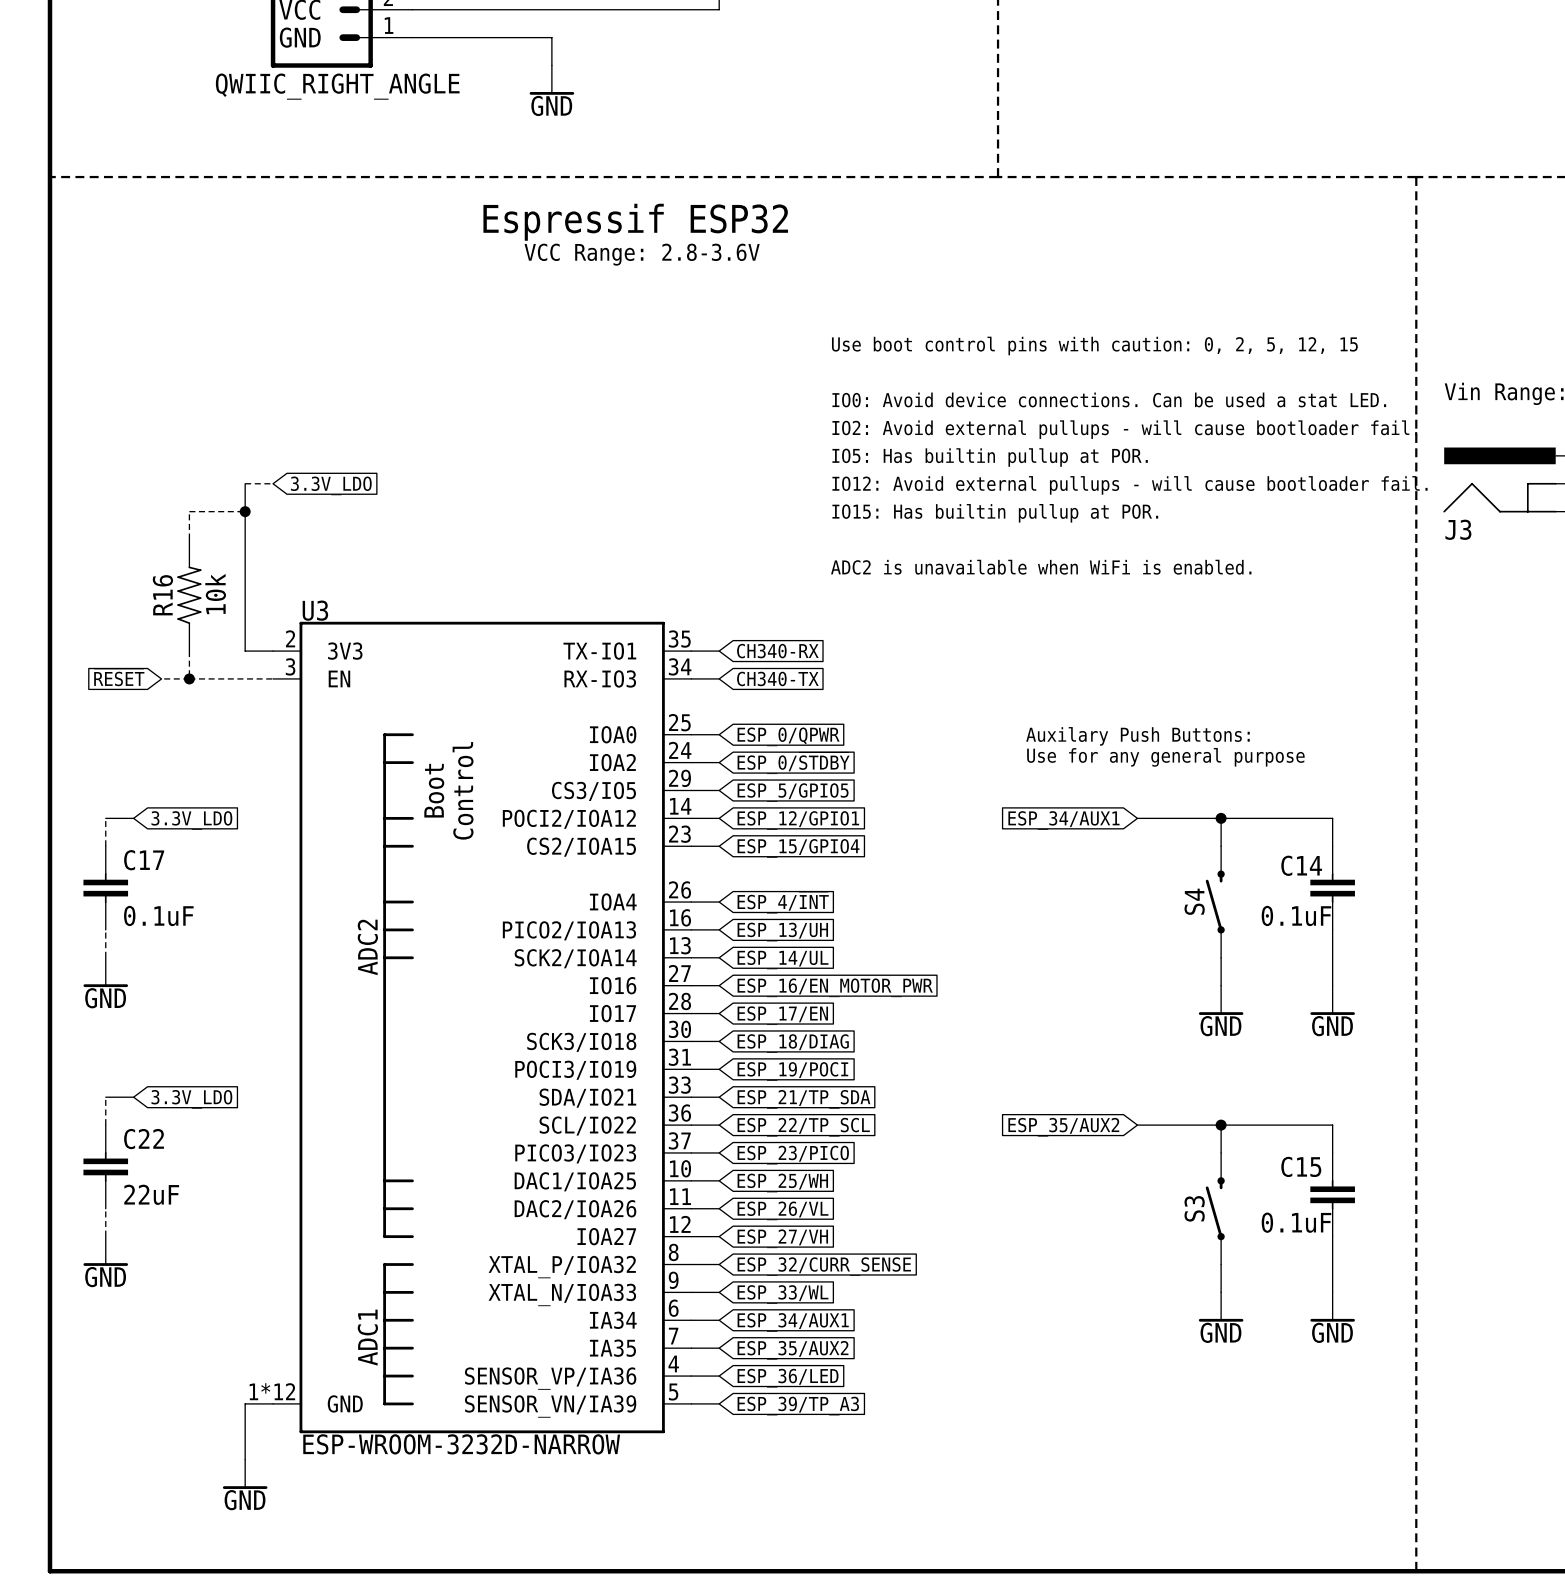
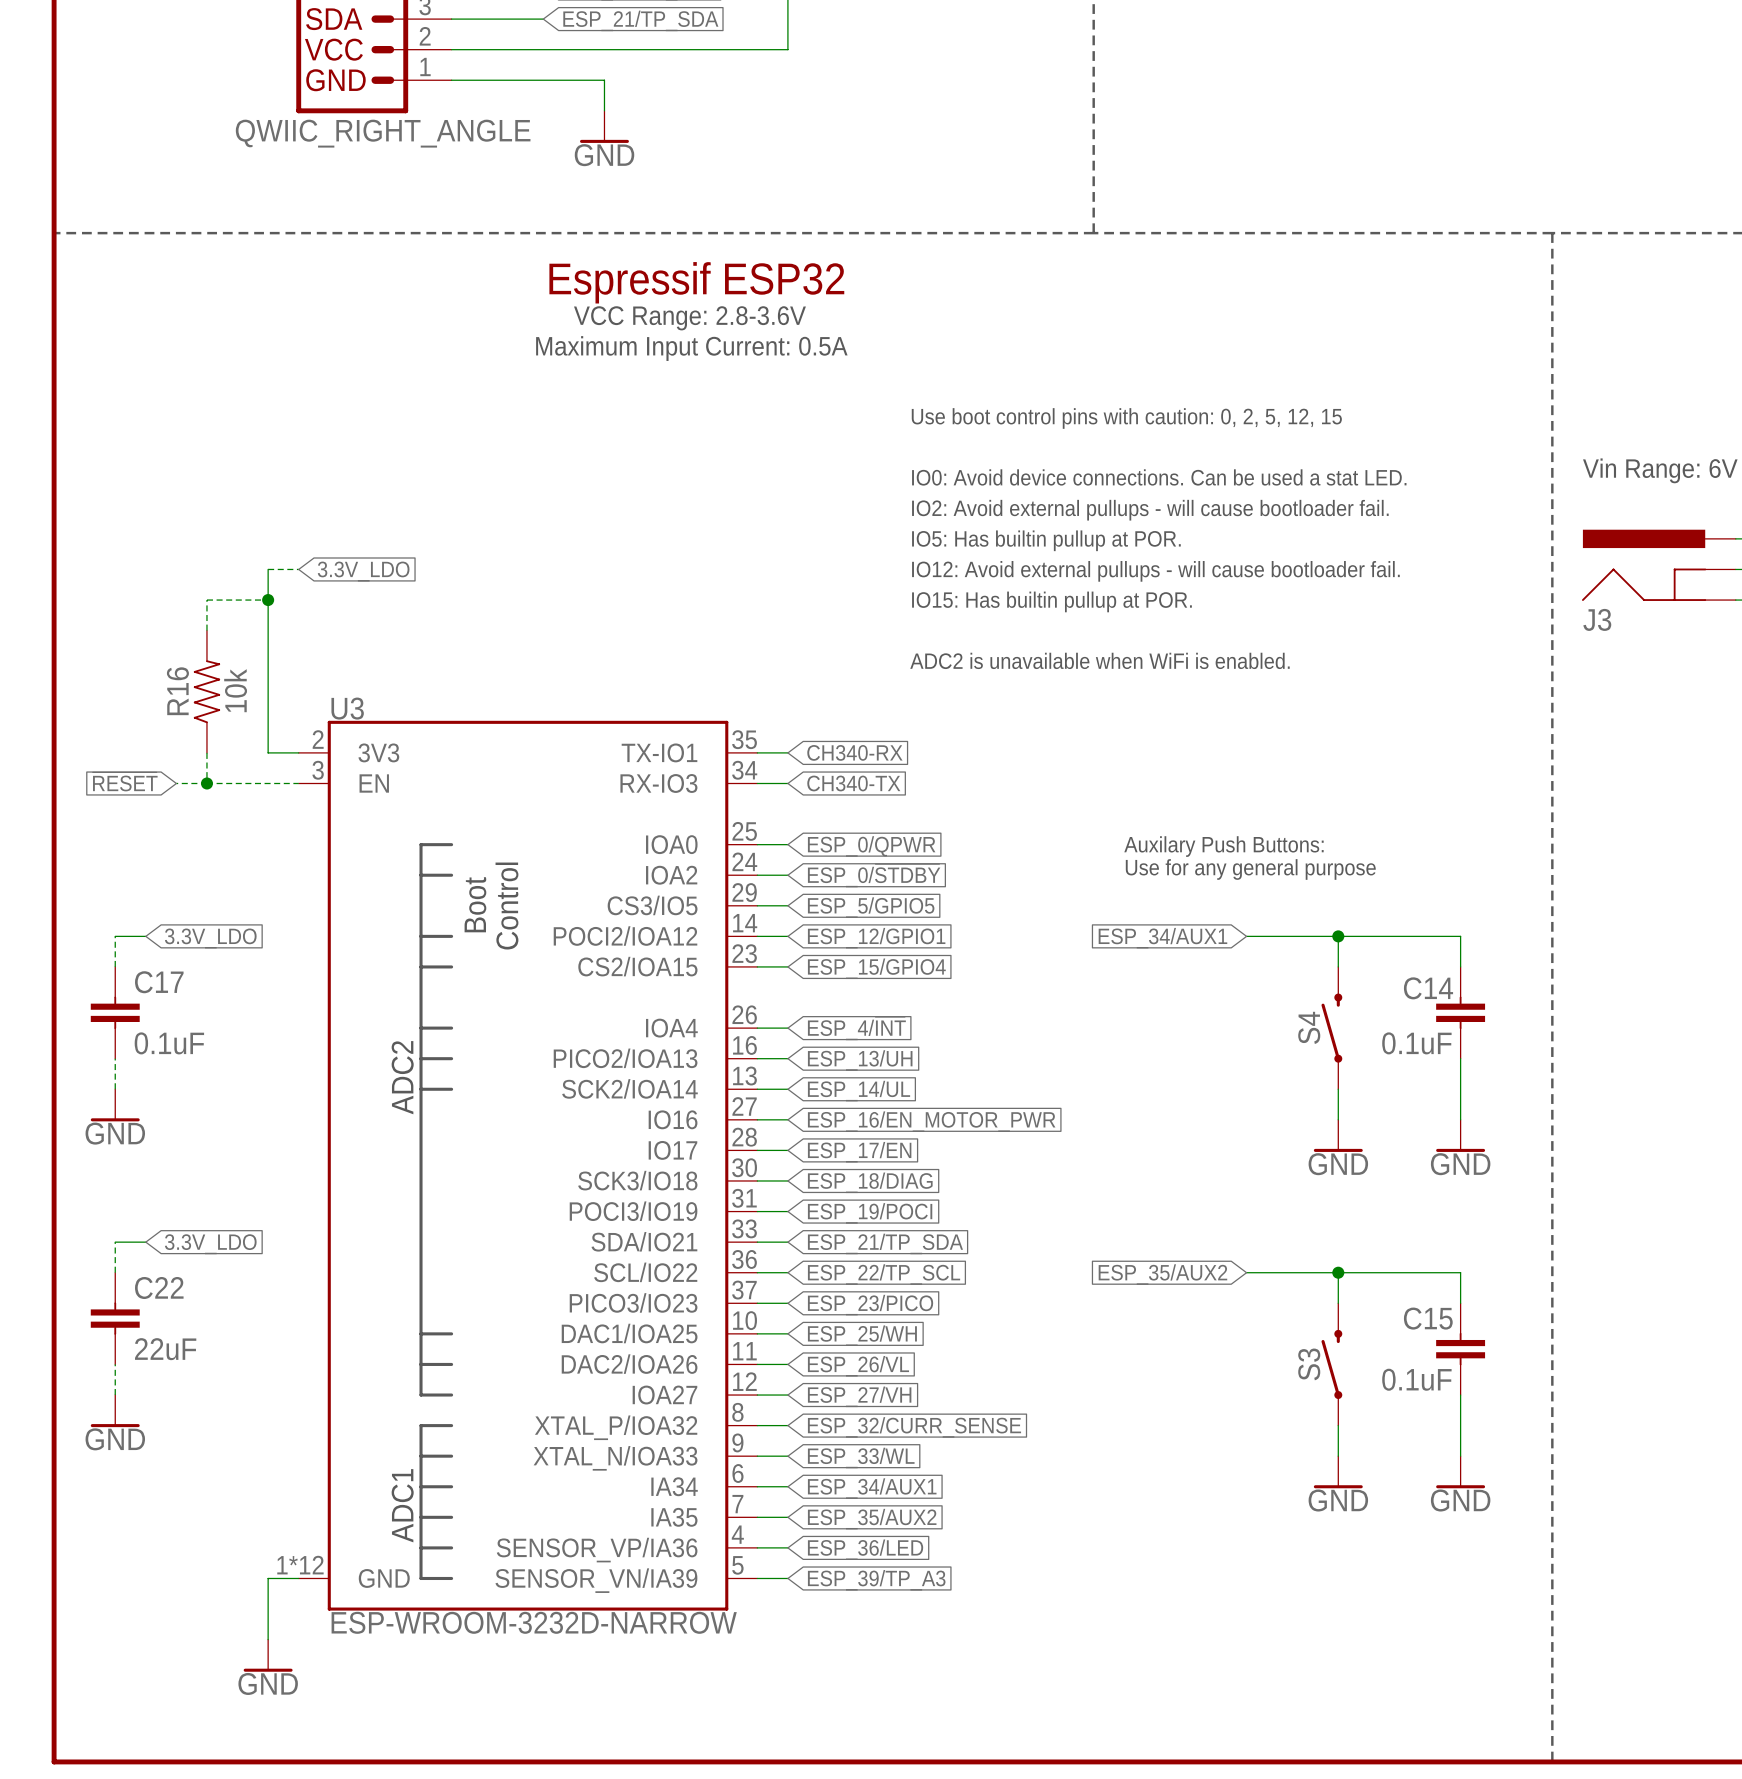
text: none -> Maximum Input Current: 0.5A (691, 348)

